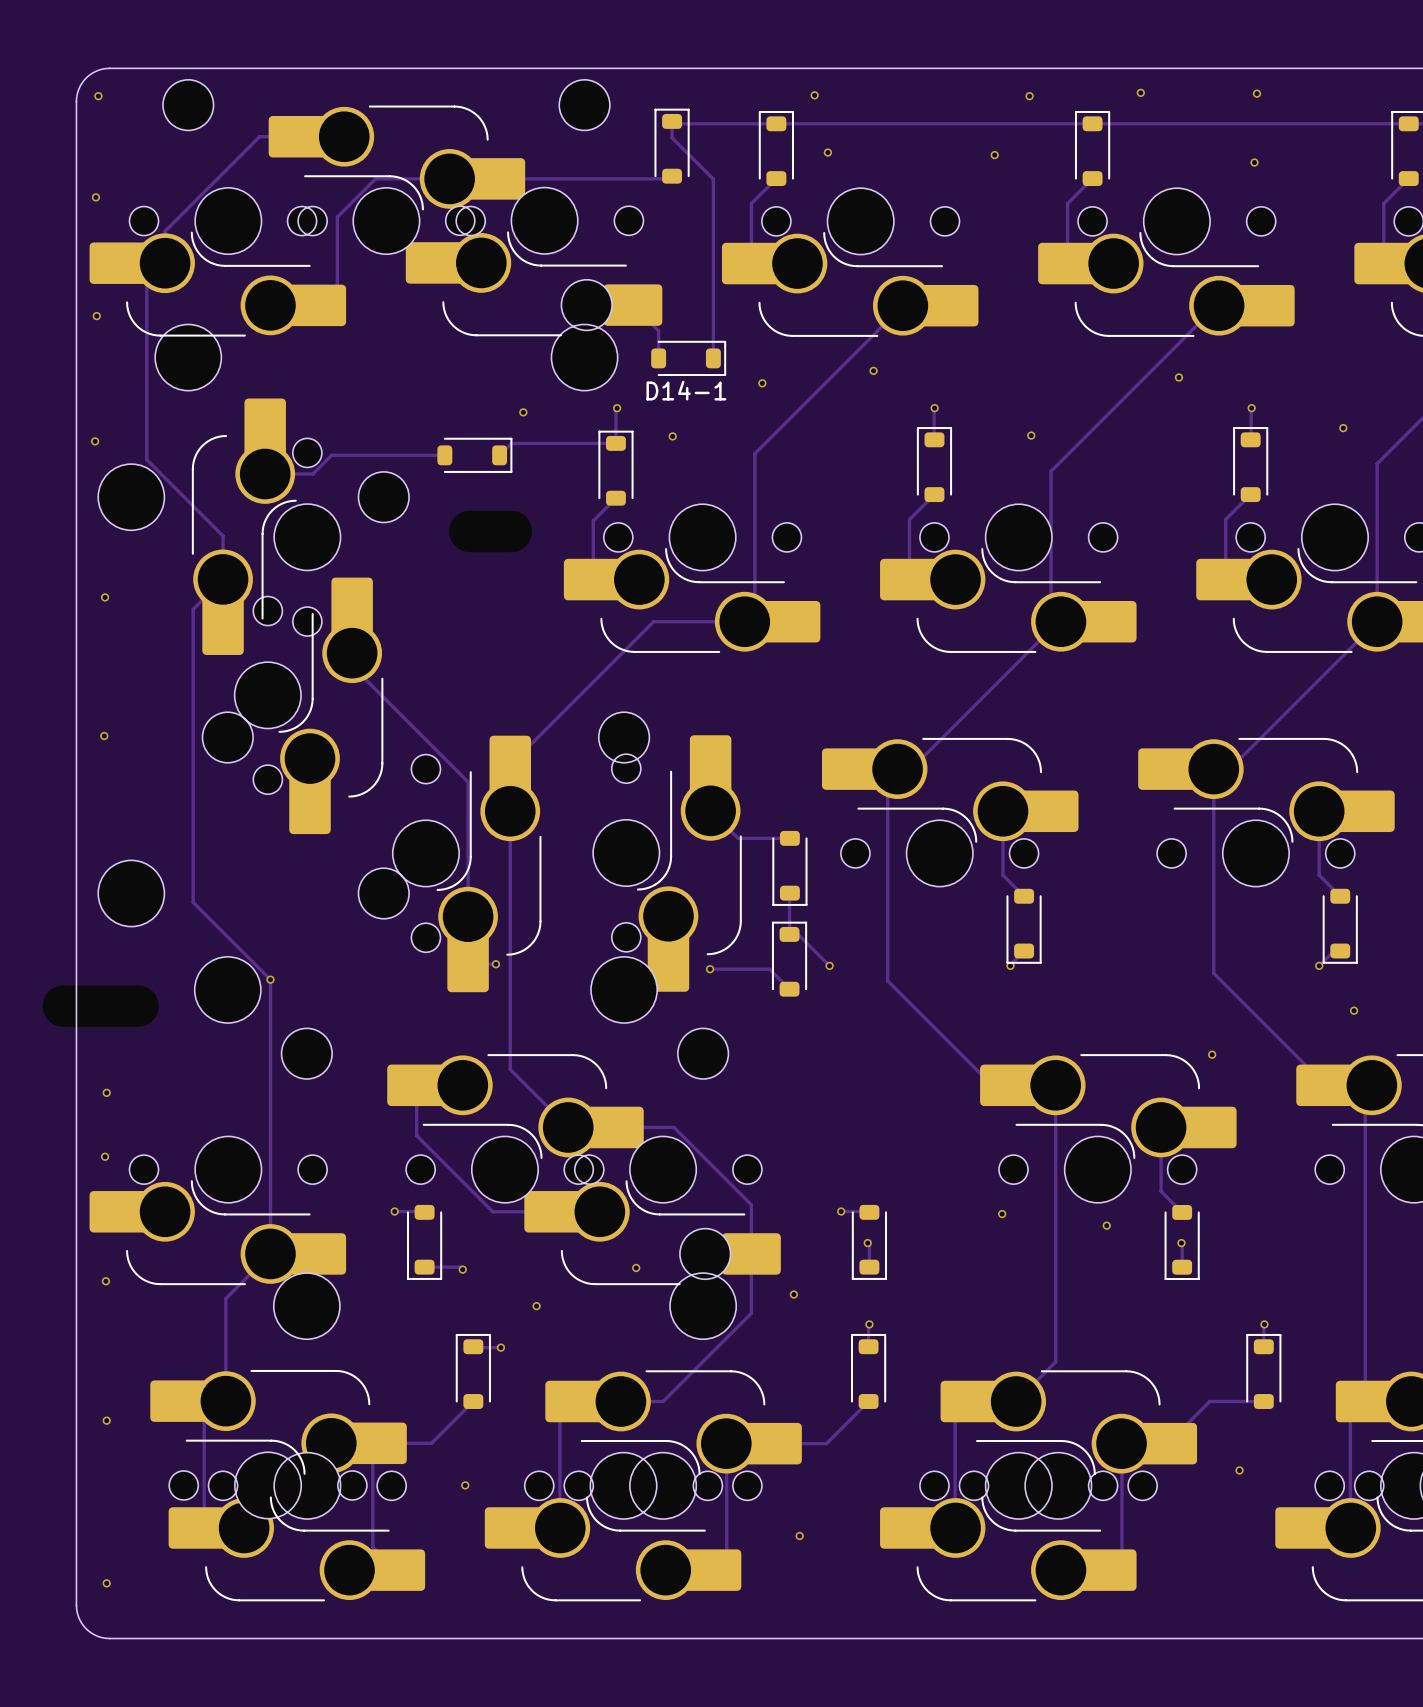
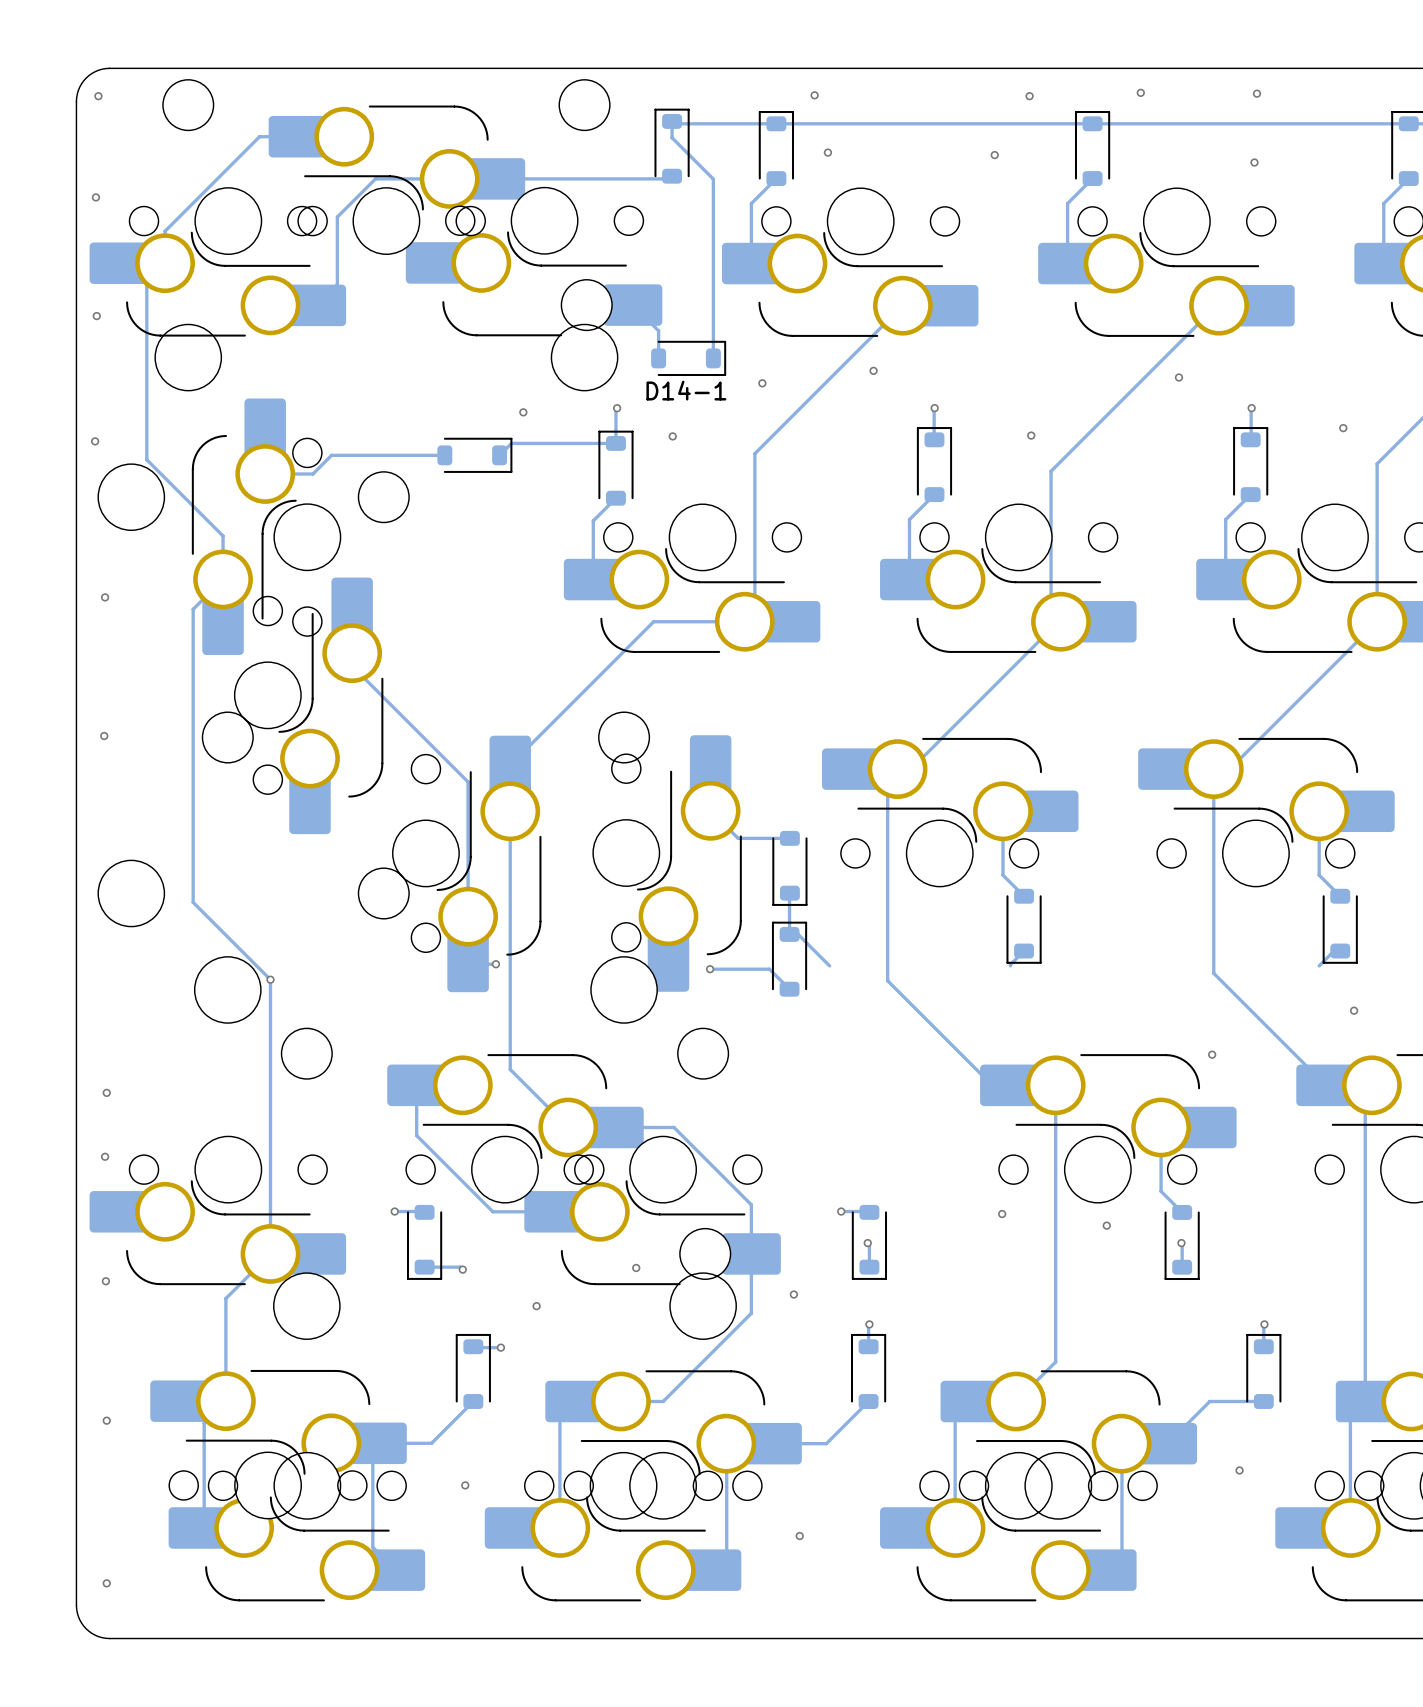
via: (829, 965) -> none
via: (1010, 965) -> none
via: (1319, 965) -> none

